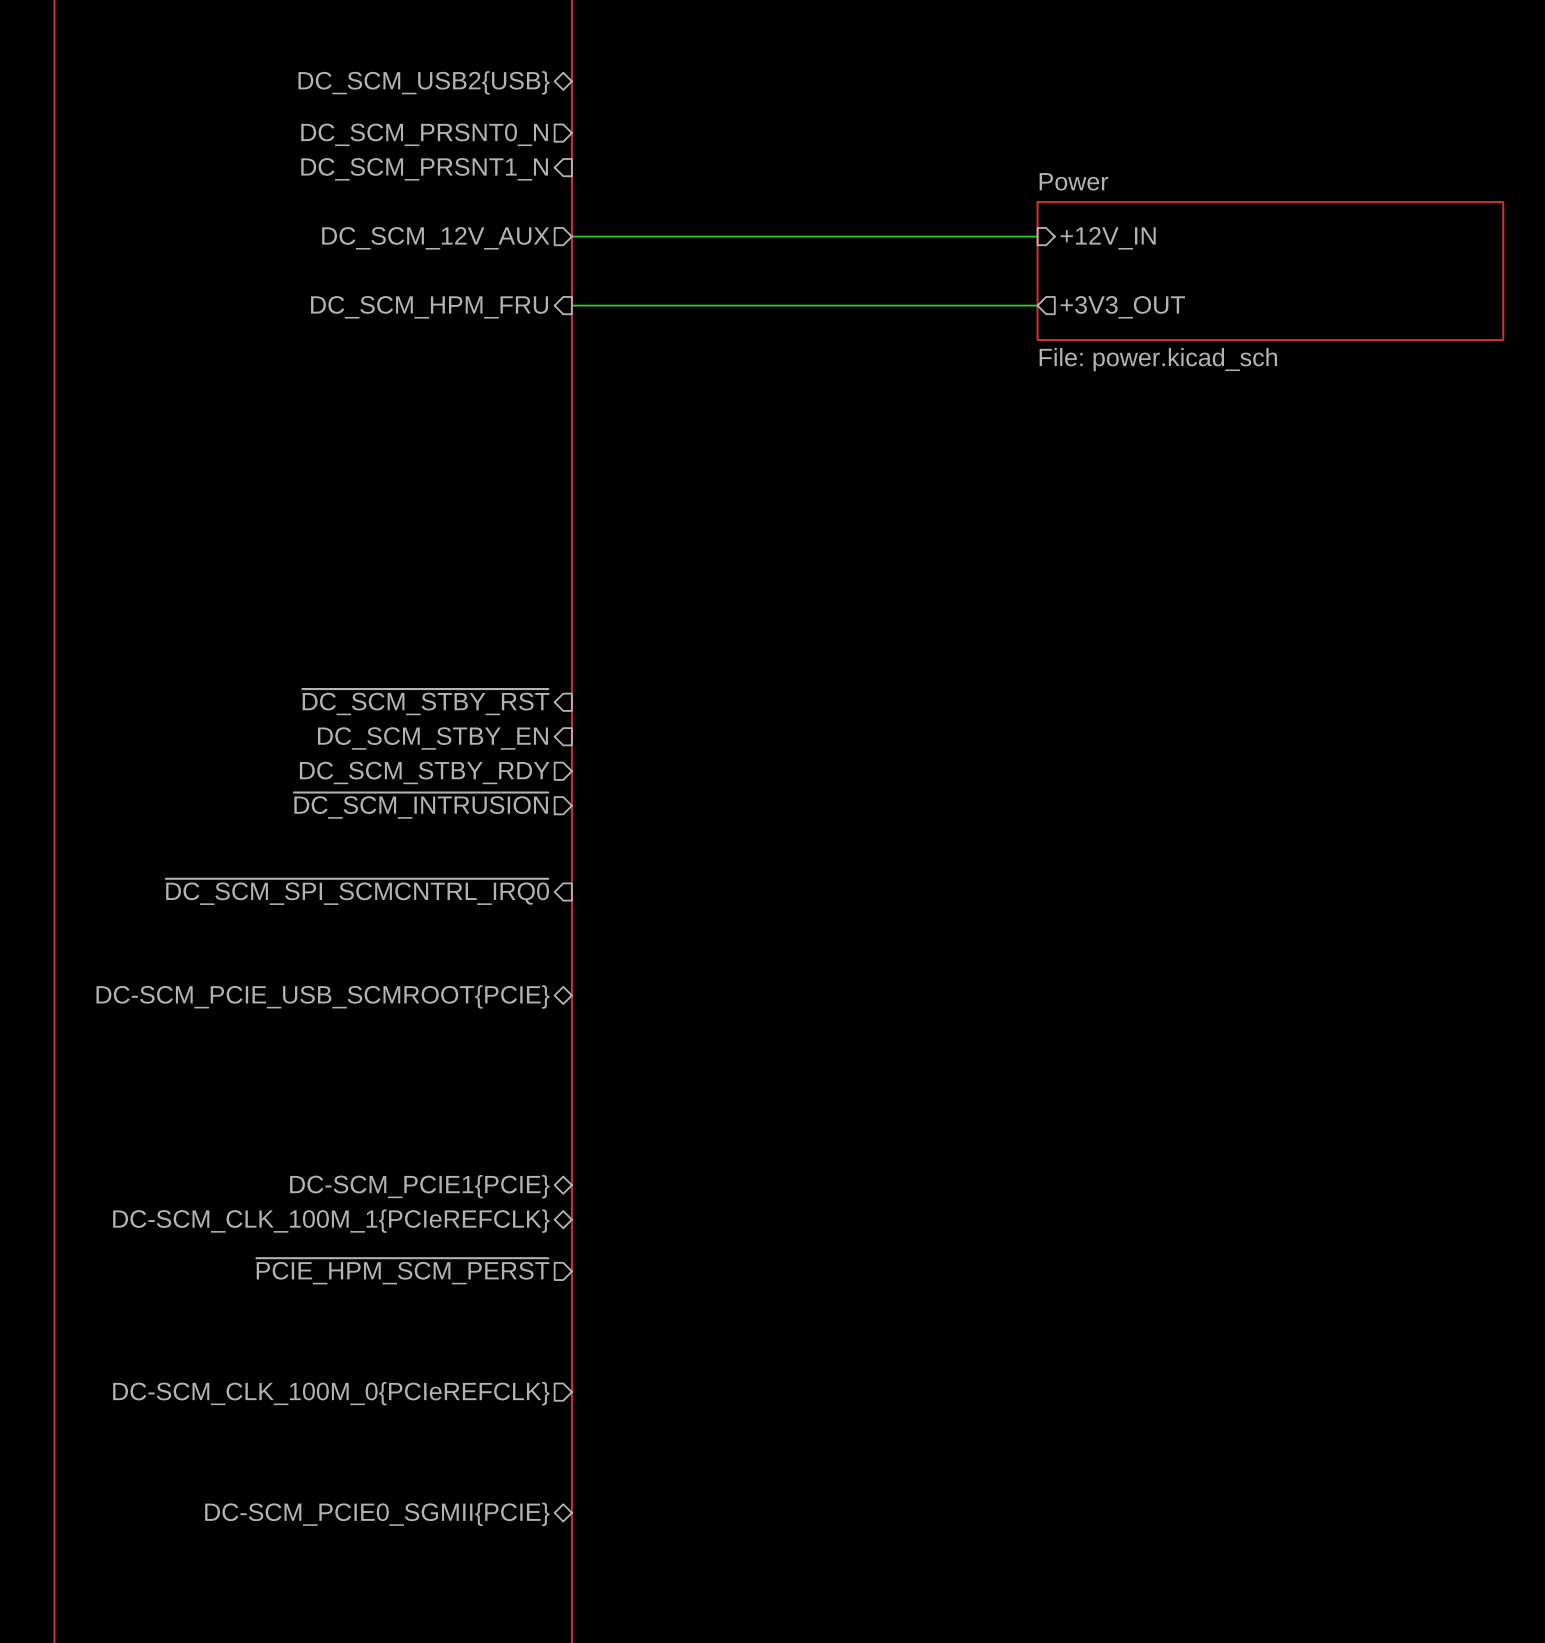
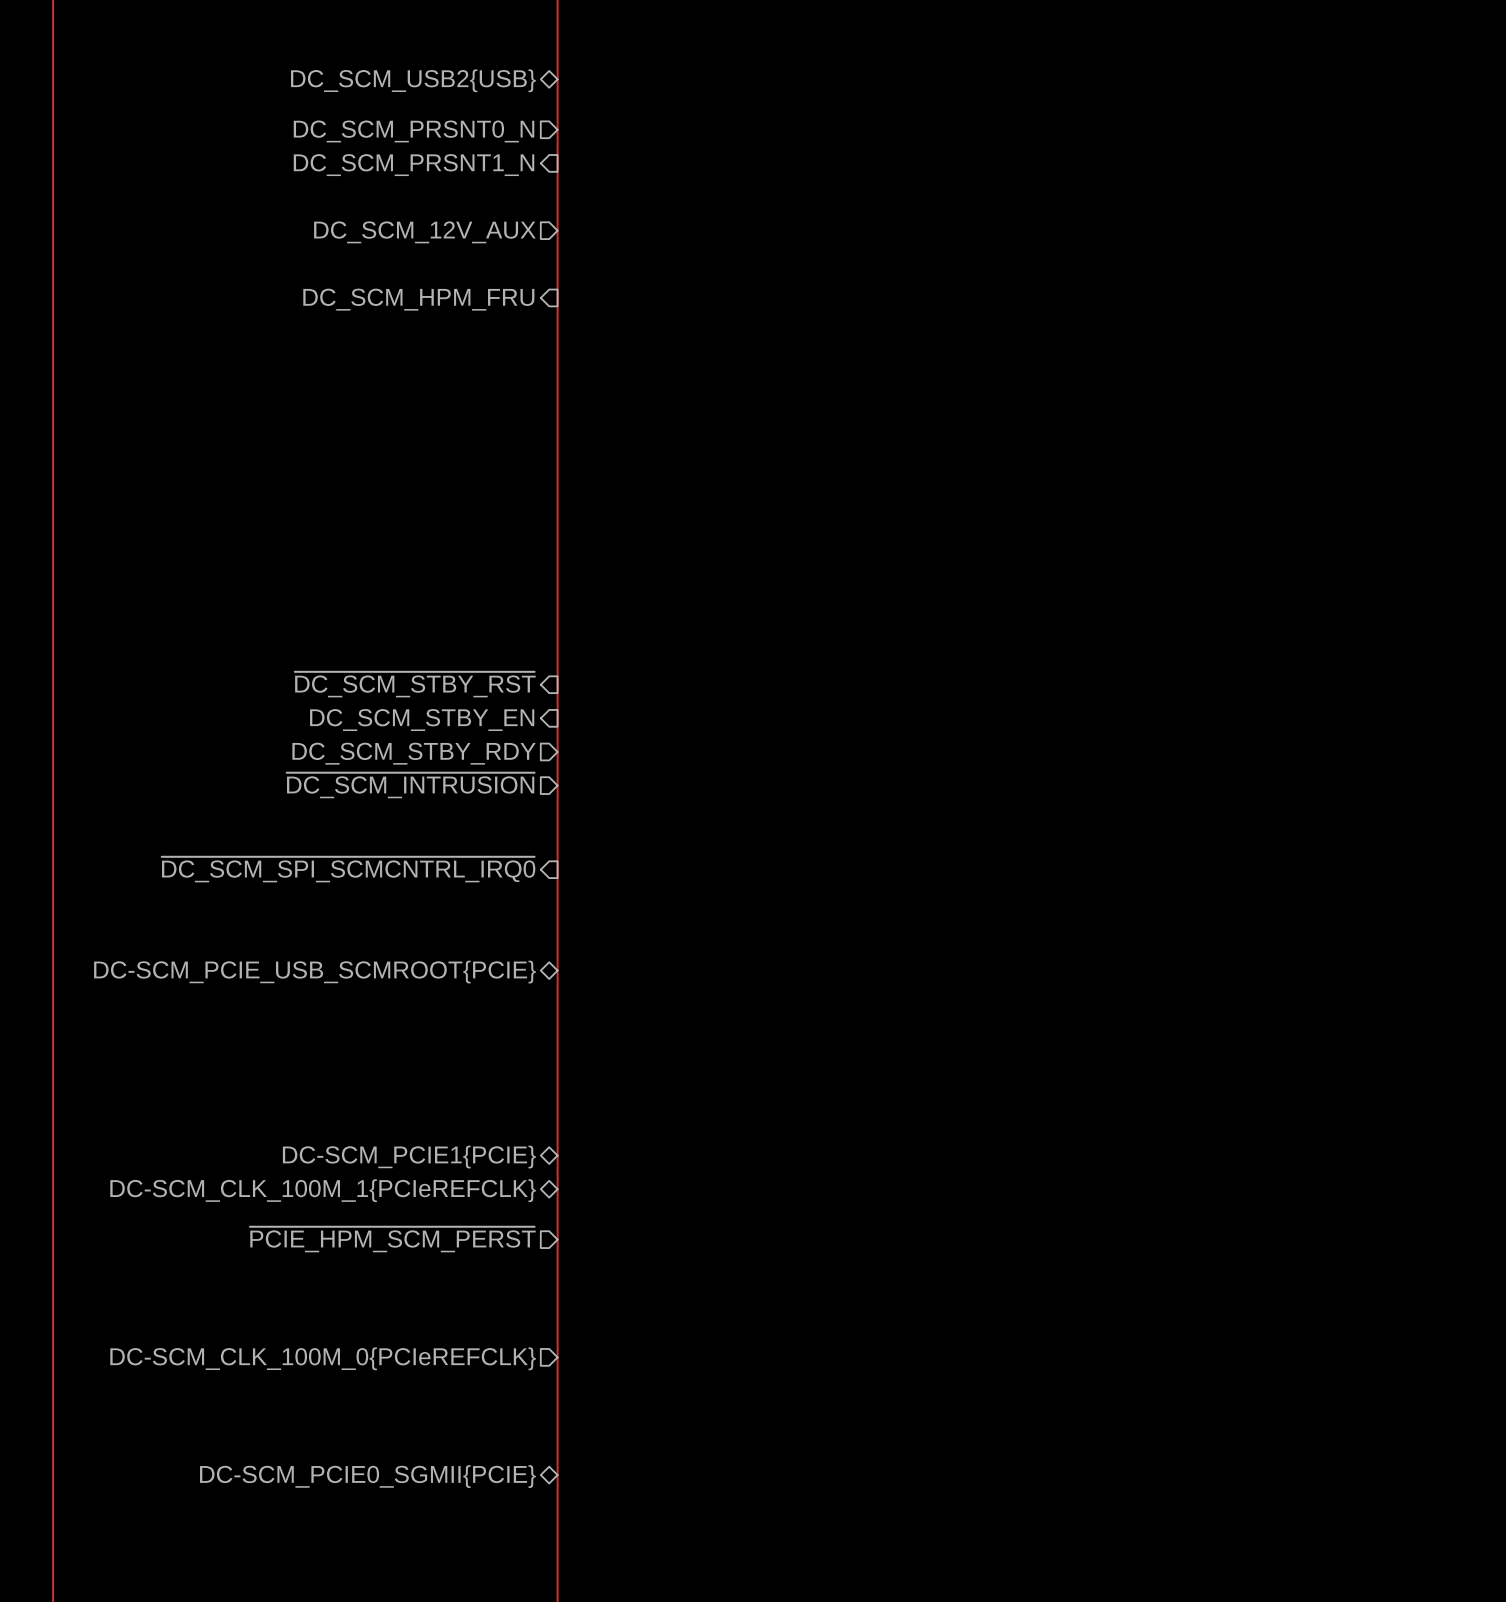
wire: (571, 236) (1037, 236) -> none
sheet pin: +12V_IN (1108, 238) -> none
sheet Power: File: power.kicad_sch (1270, 271) -> none
wire: (571, 305) (1037, 305) -> none
sheet pin: +3V3_OUT (1122, 307) -> none

